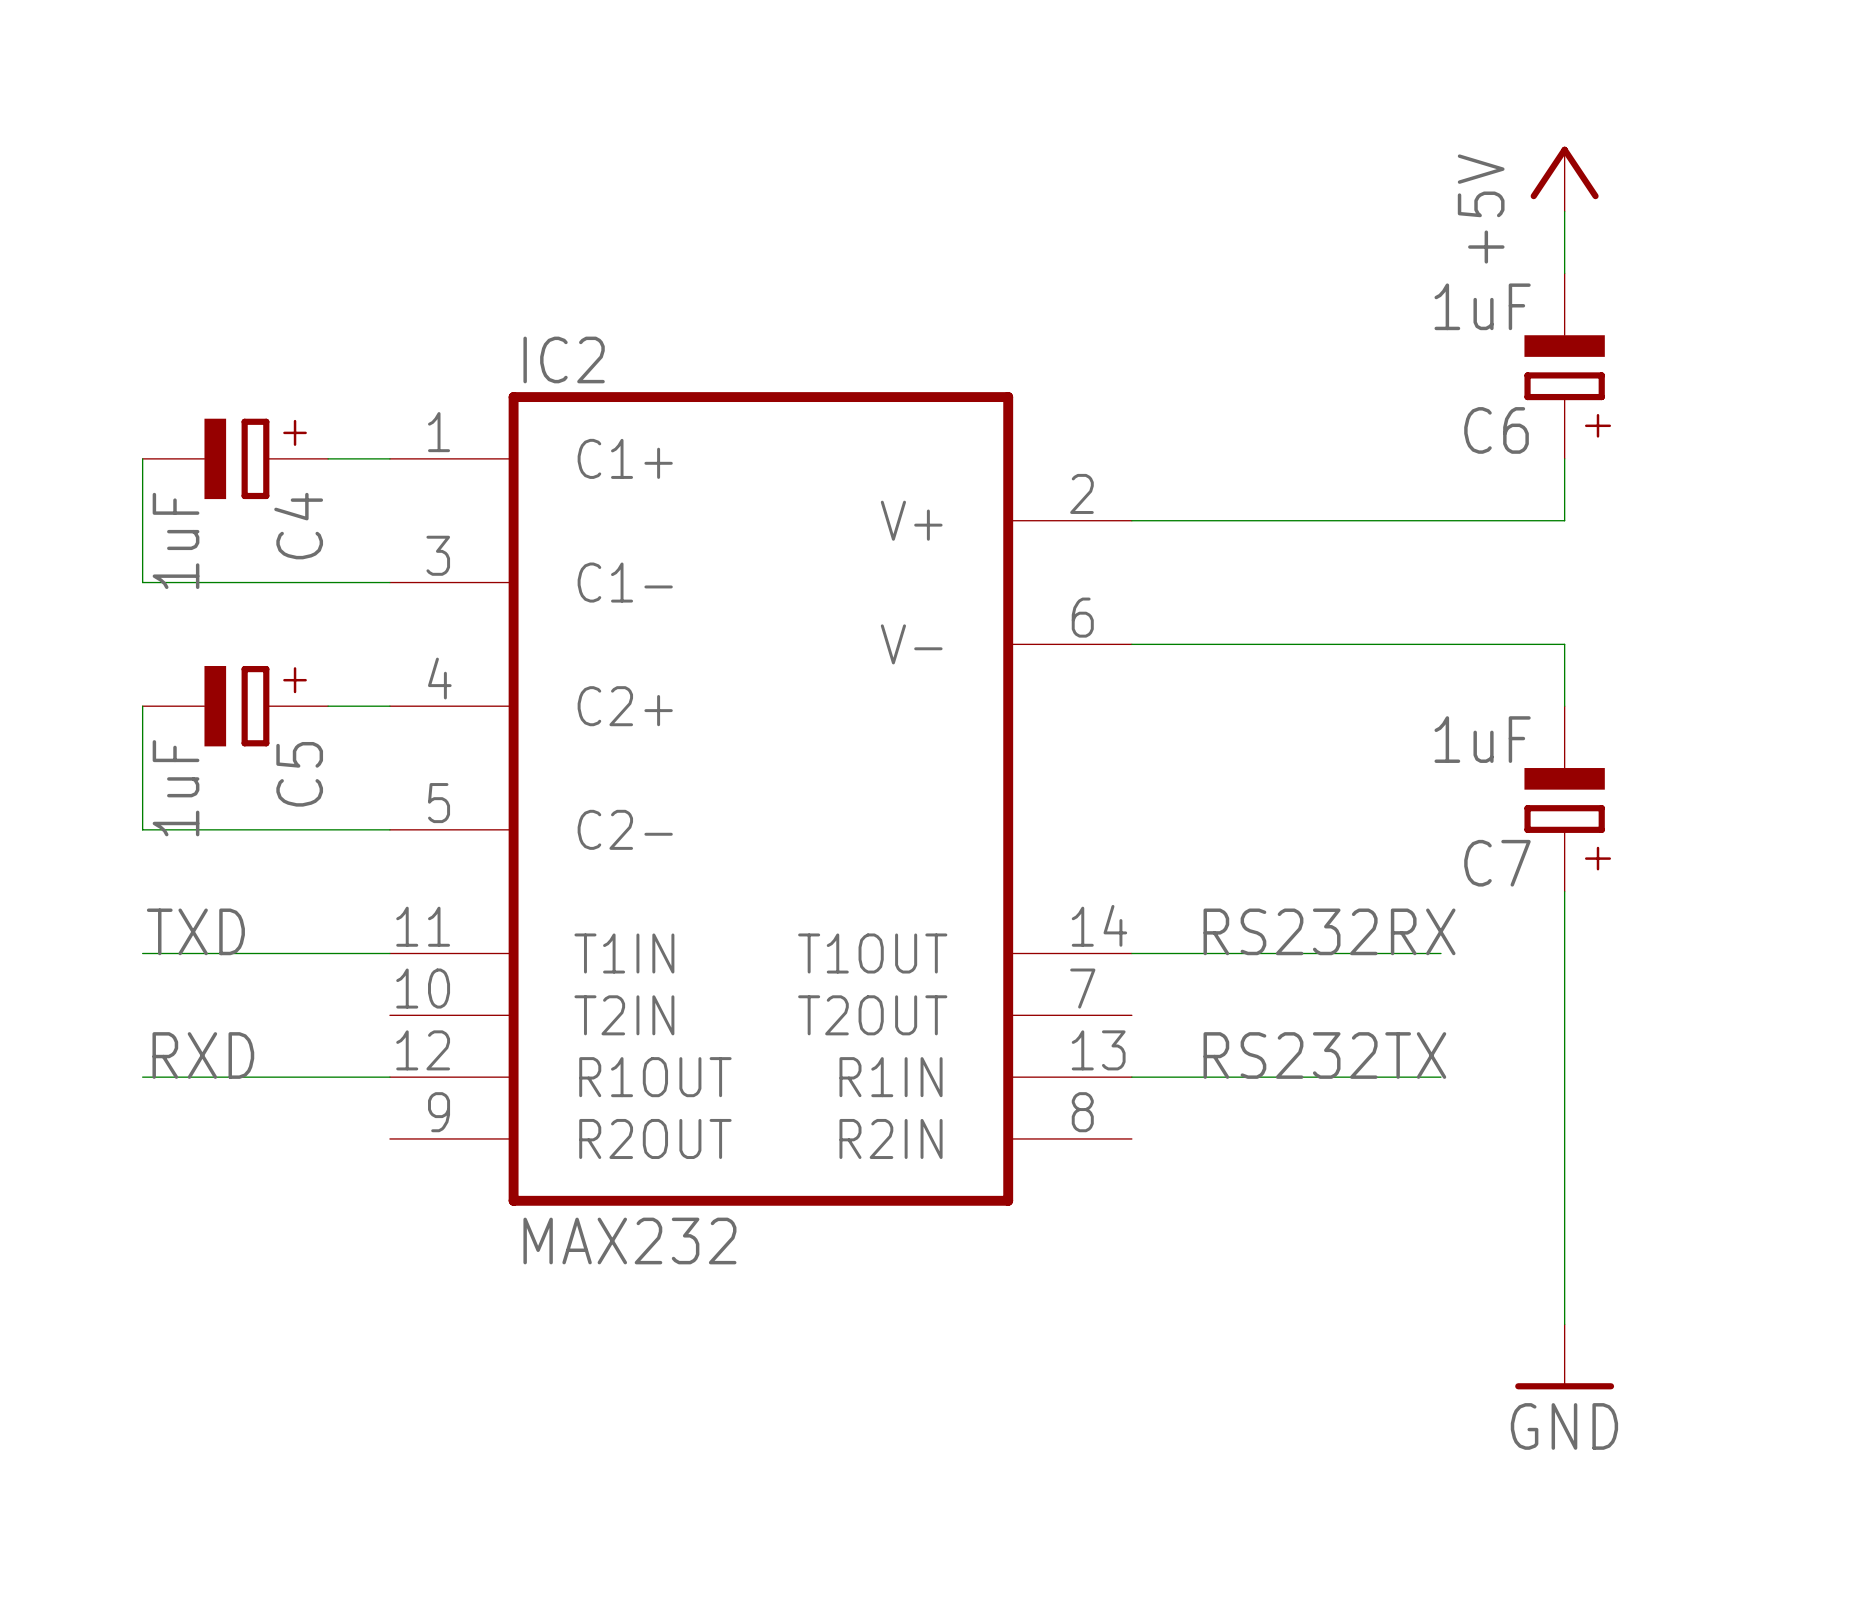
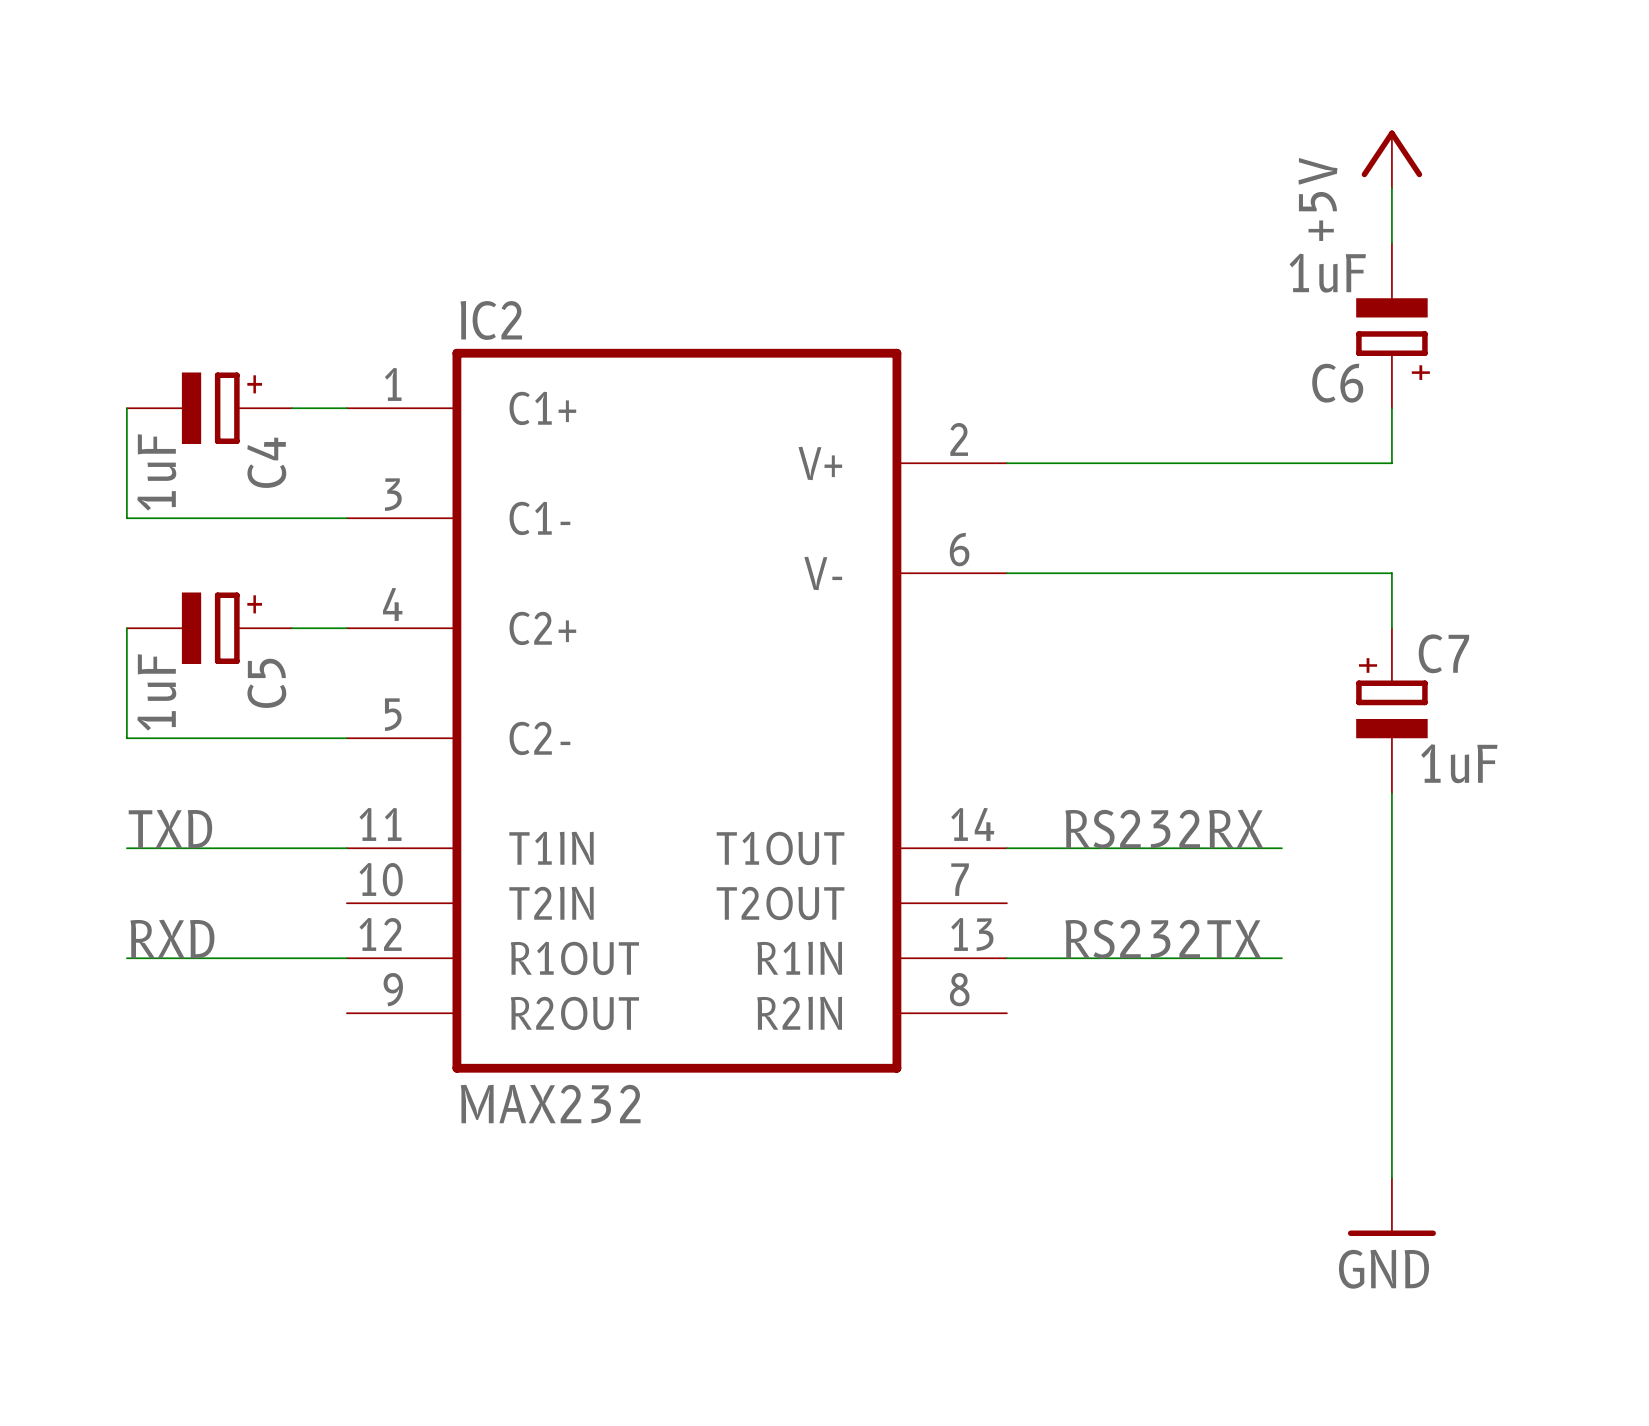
C7 symbol: [1524, 706, 1605, 892] -> [1356, 628, 1428, 794]
C7 value position: 1uF (1482, 739) -> 1uF (1459, 763)
C7 name position: C7 (1497, 863) -> C7 (1443, 653)

